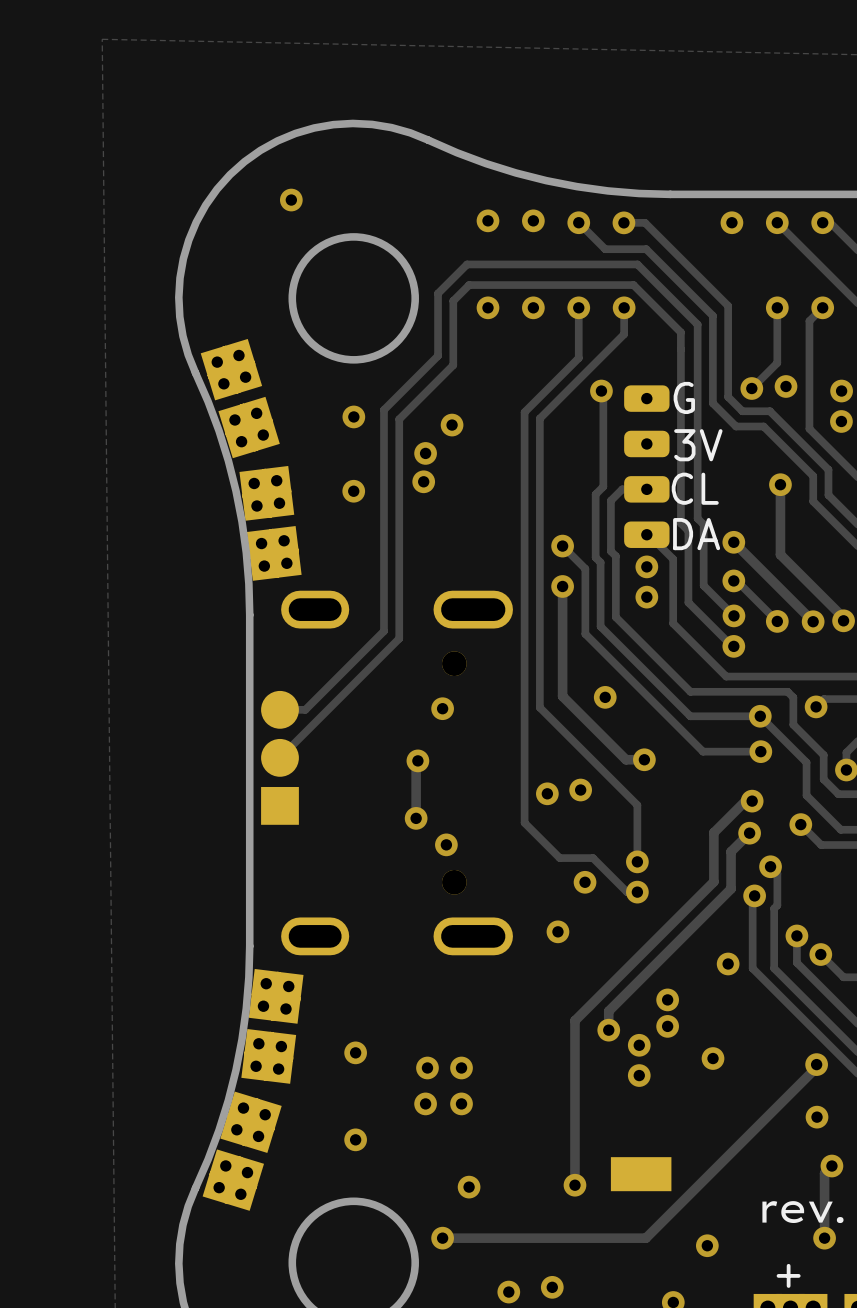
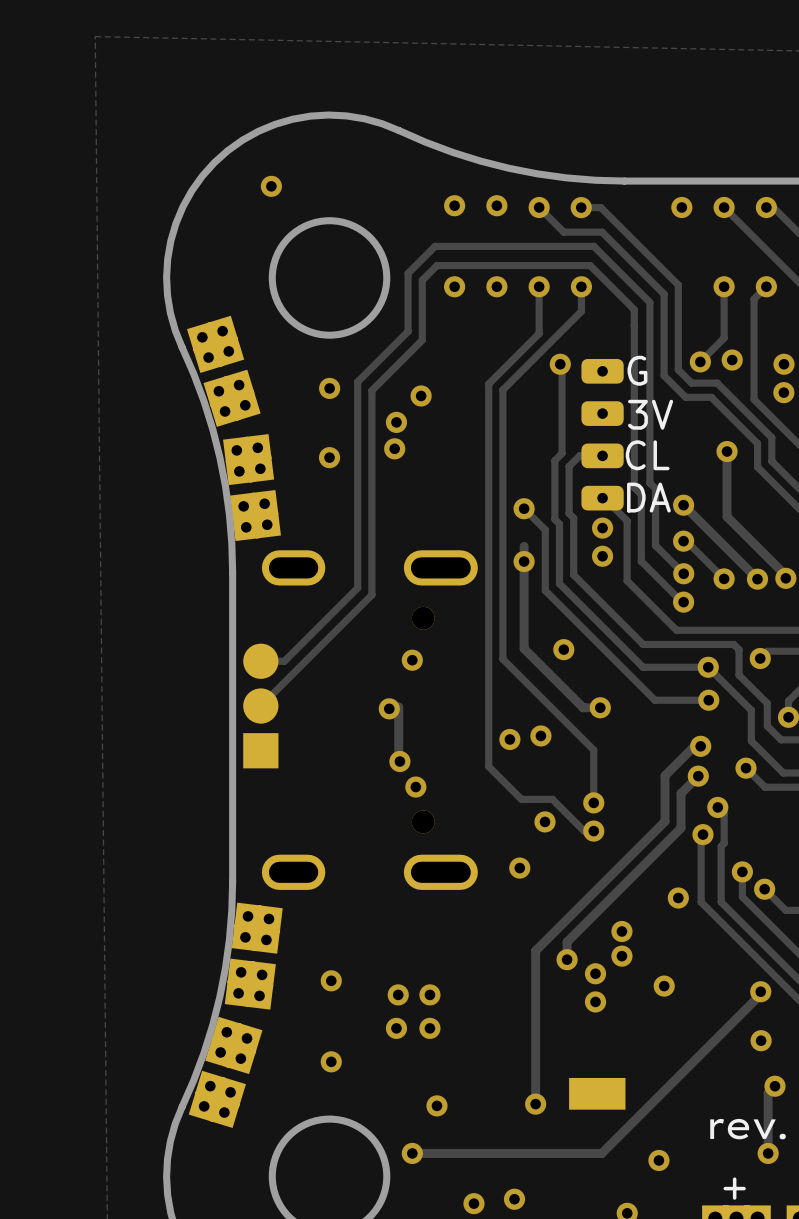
via position: (562, 586) -> (524, 561)
track: none -> (398, 706) (399, 761)
track: (417, 760) (416, 762) (416, 818) -> none
via position: (416, 818) -> (399, 761)

